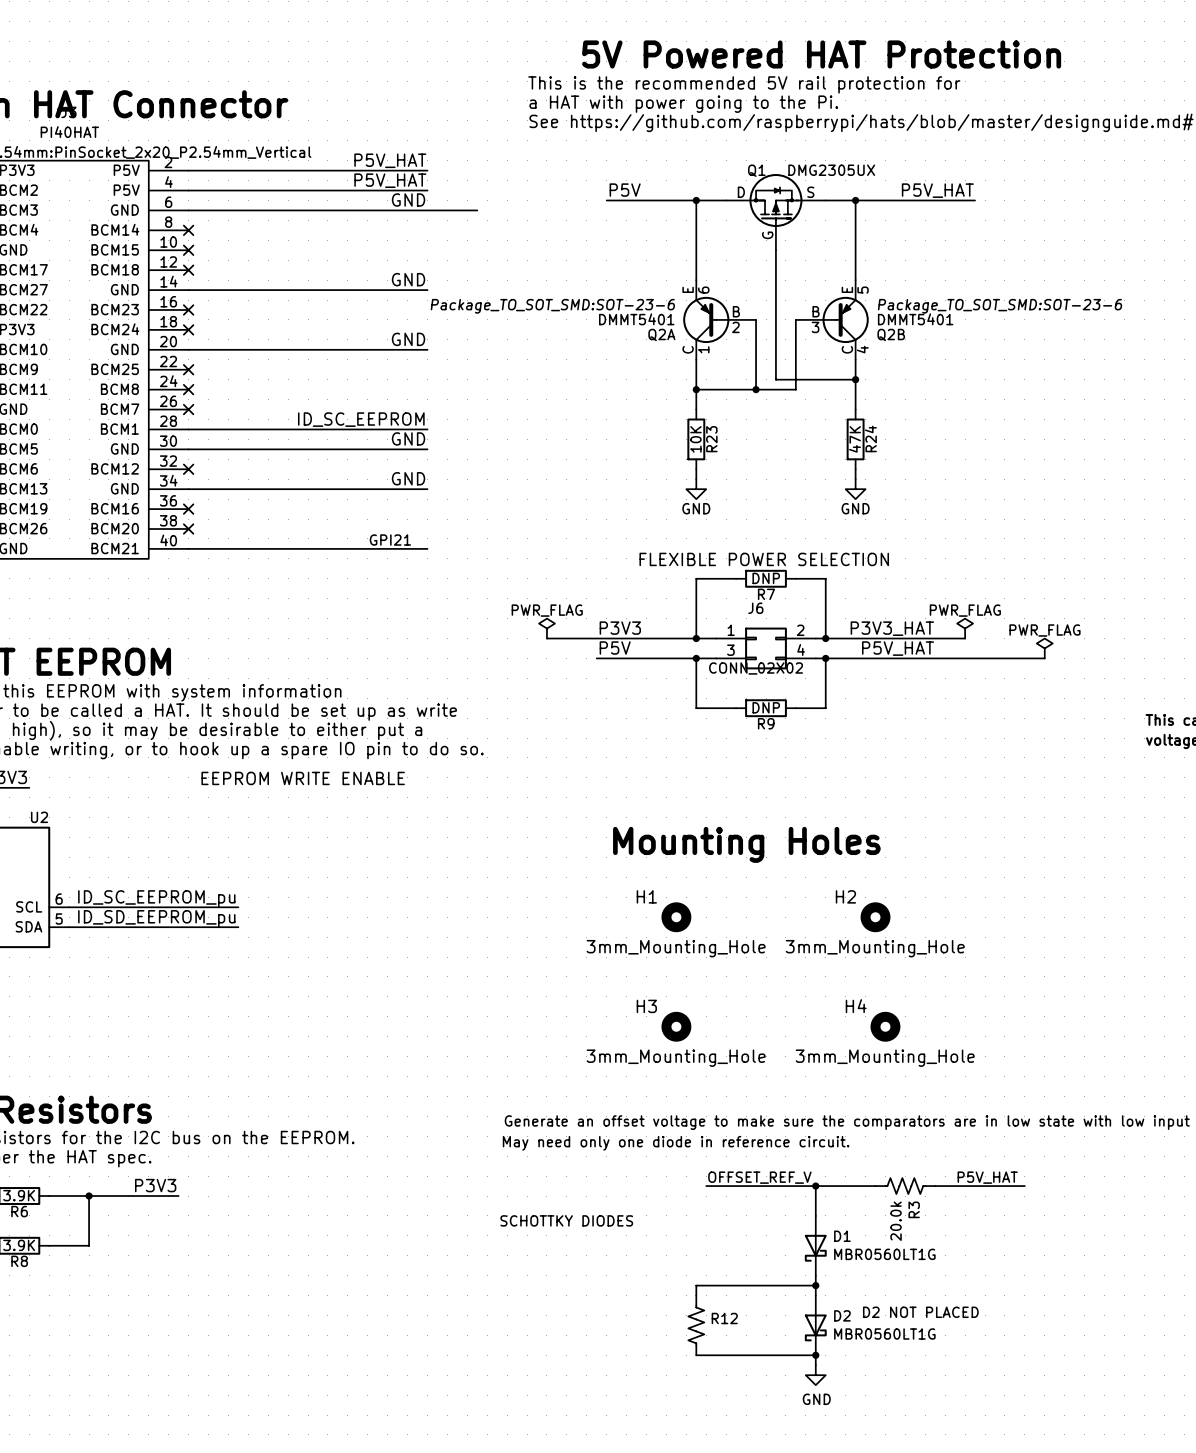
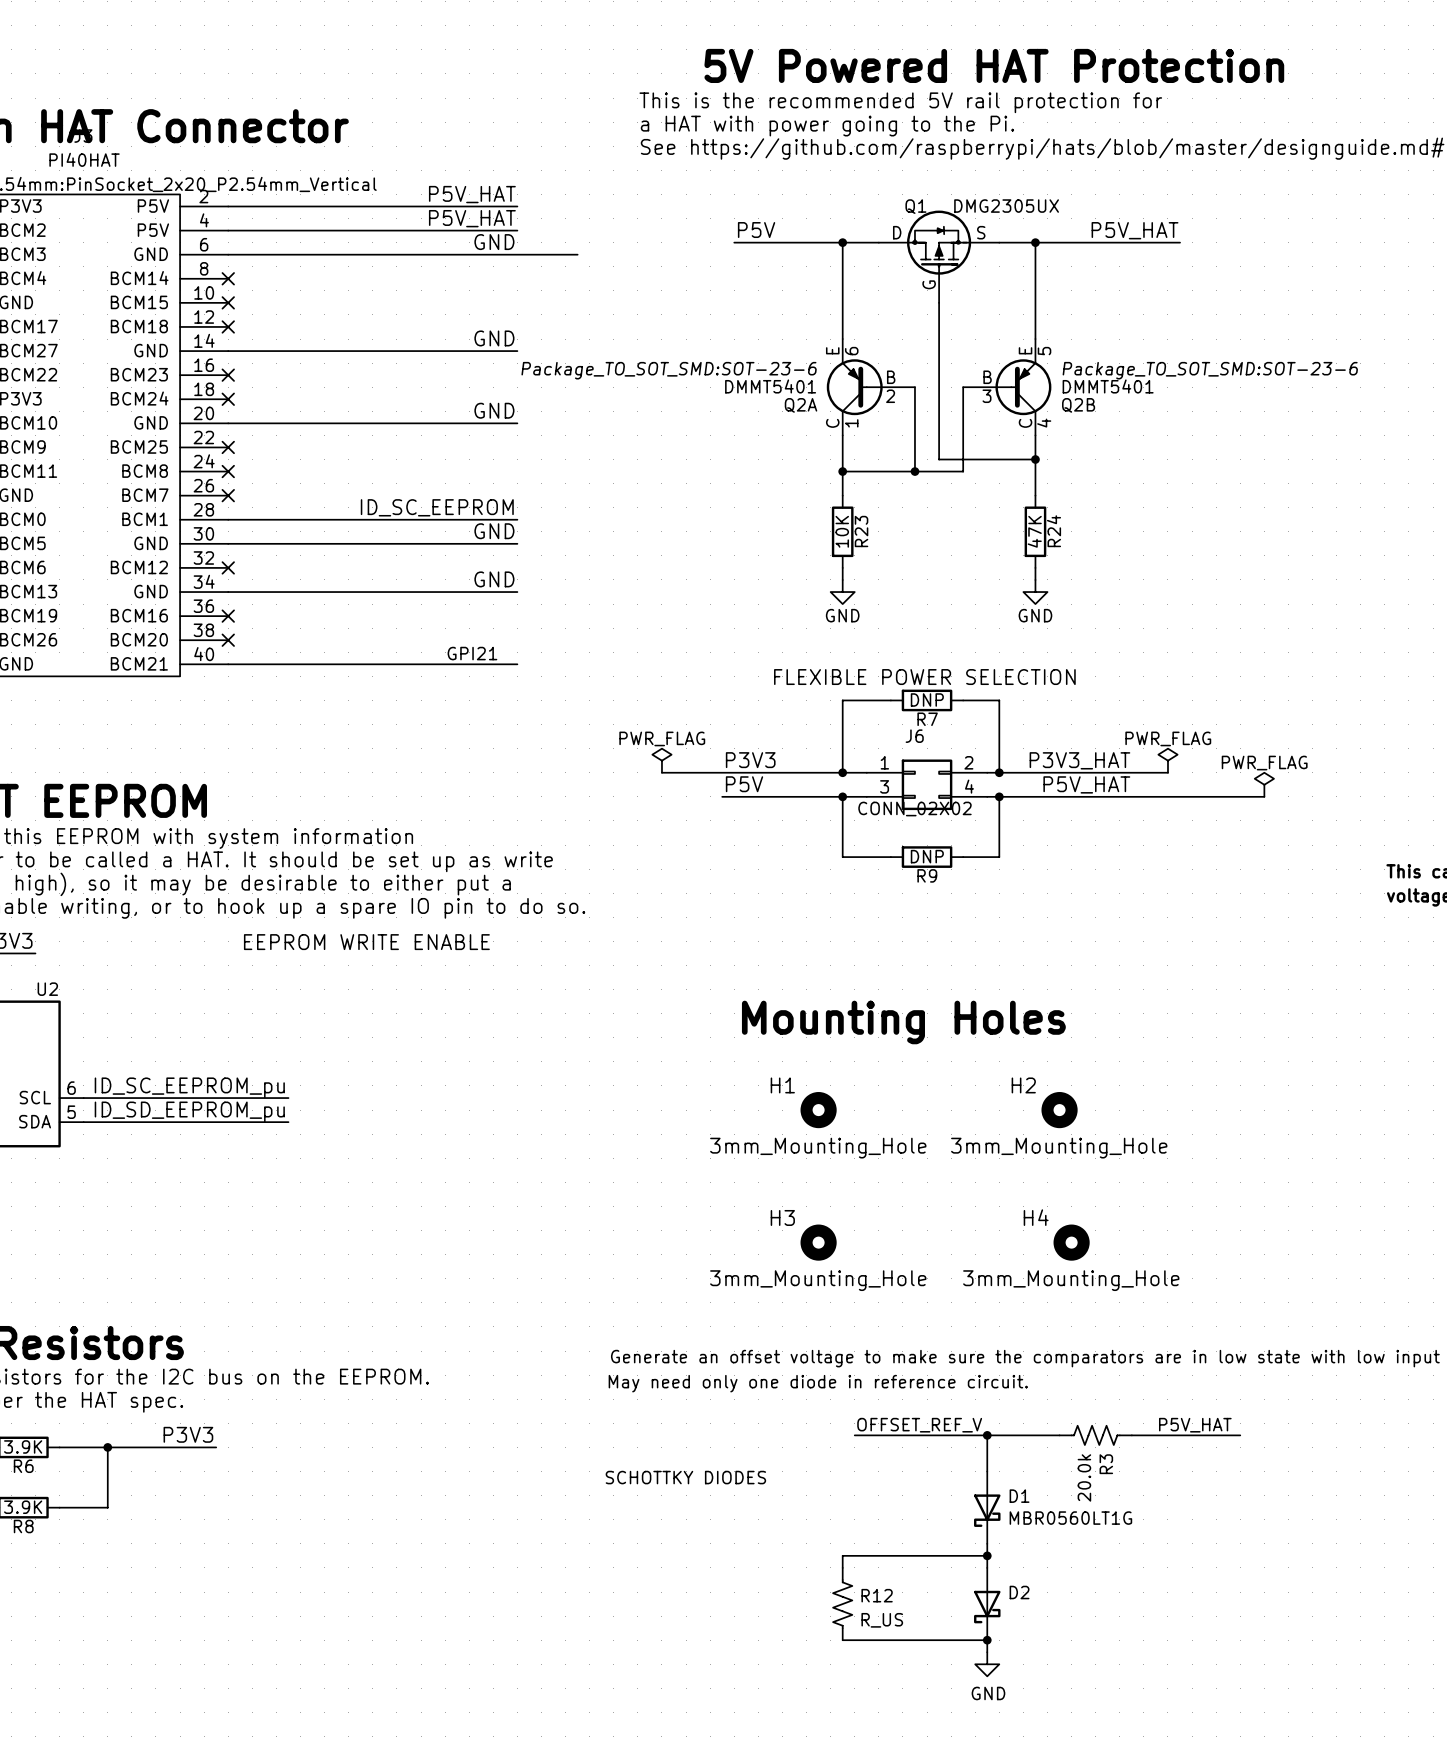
text: D2 NOT PLACED (920, 1312) -> none
D2 value: MBR0560LT1G (884, 1334) -> none
R12 value: none -> R_US (882, 1620)

